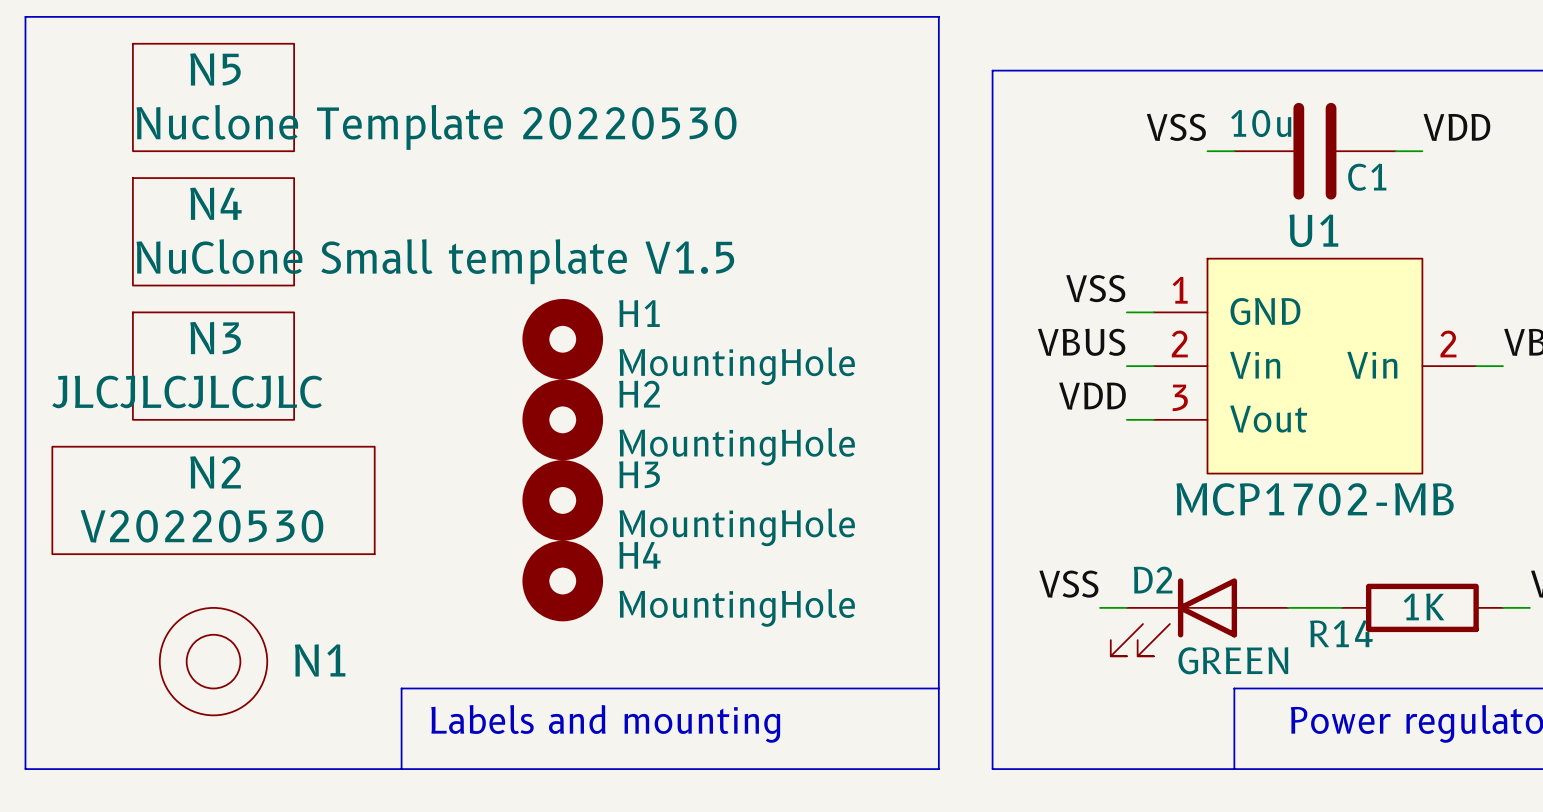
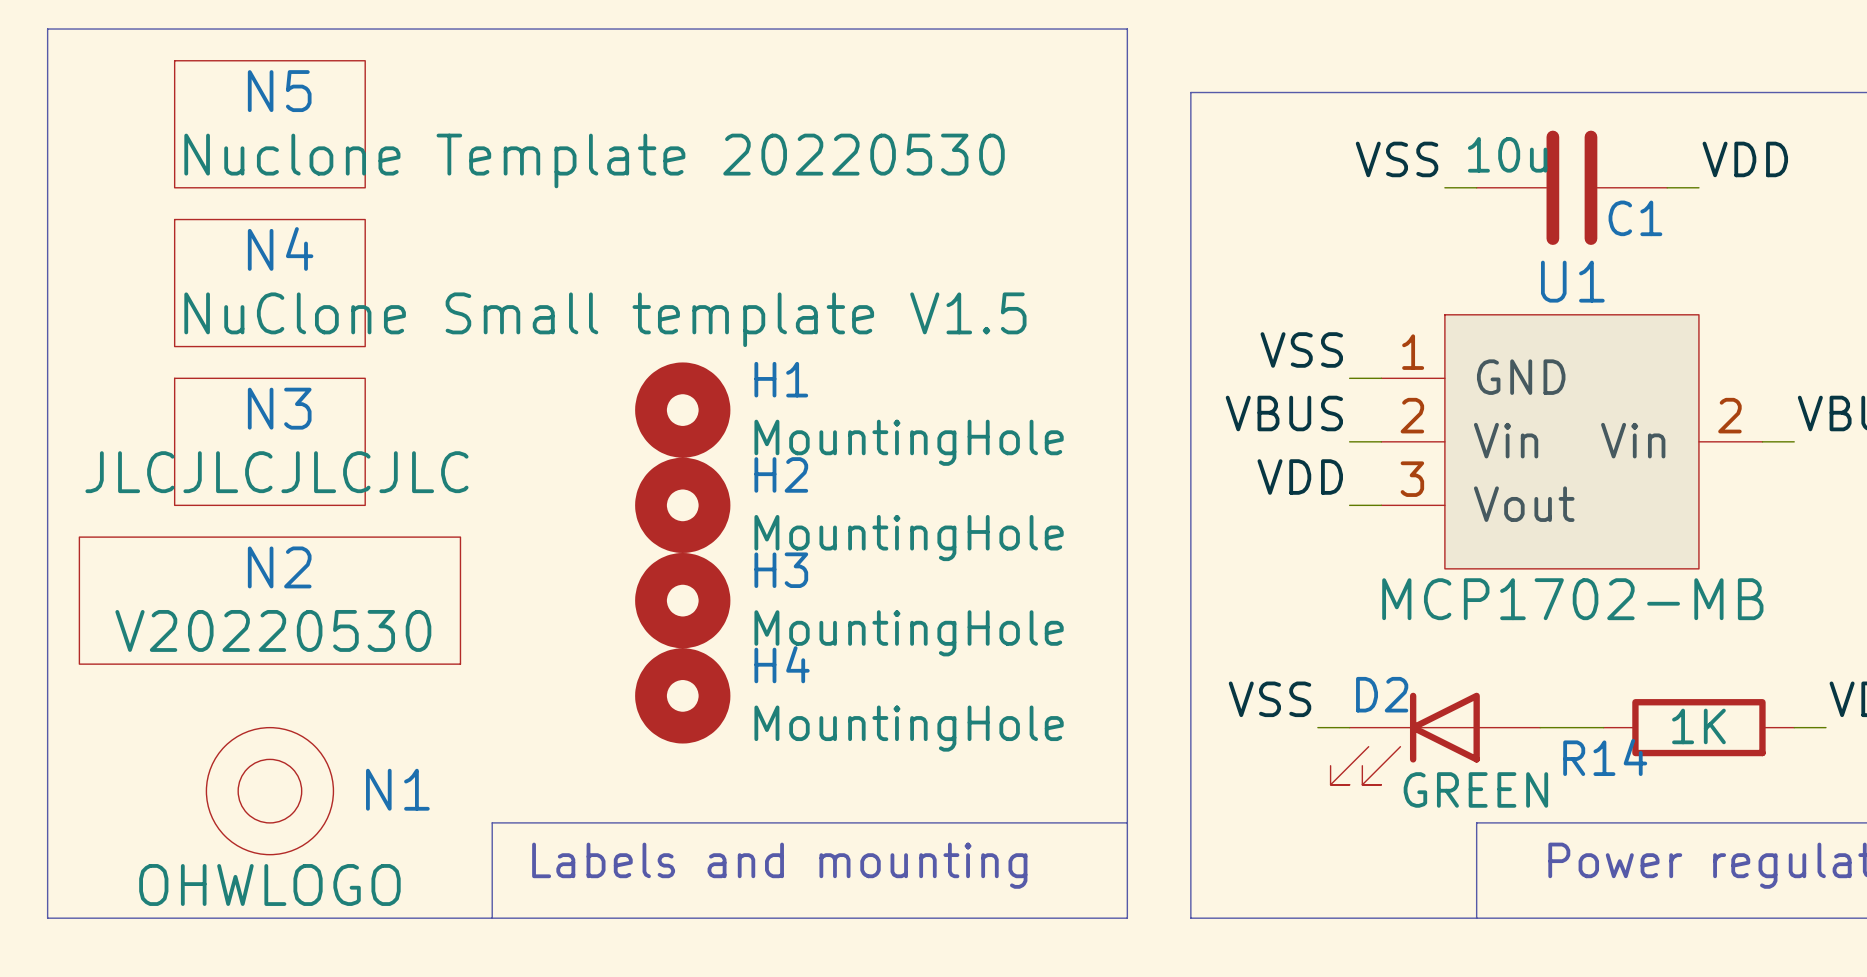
N1 value: none -> OHWLOGO (269, 884)

